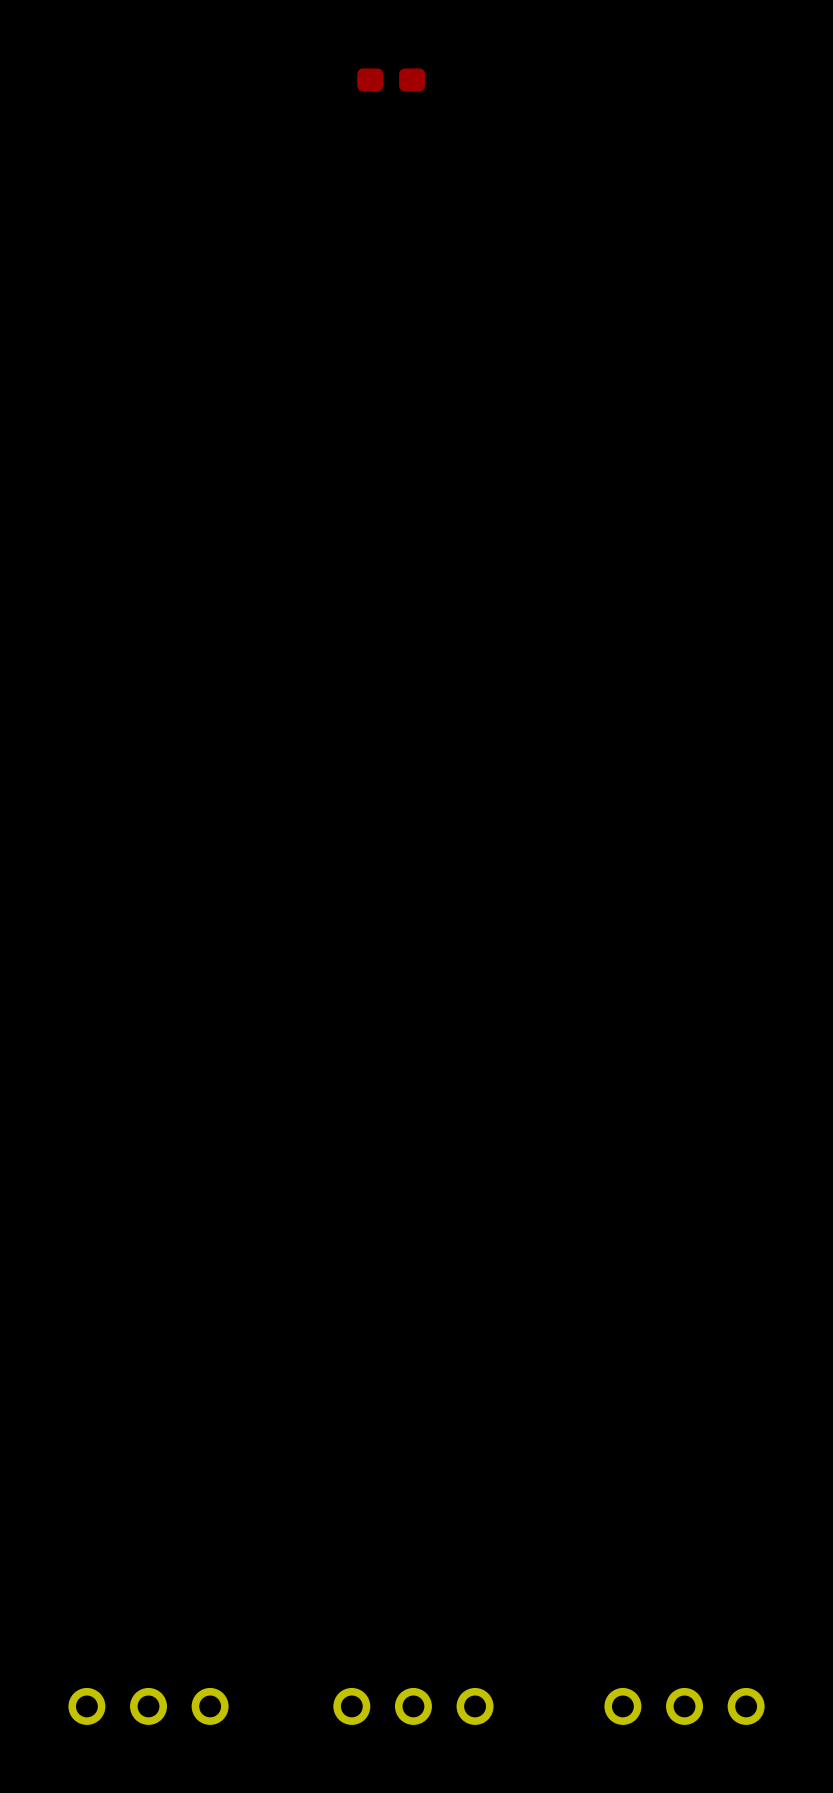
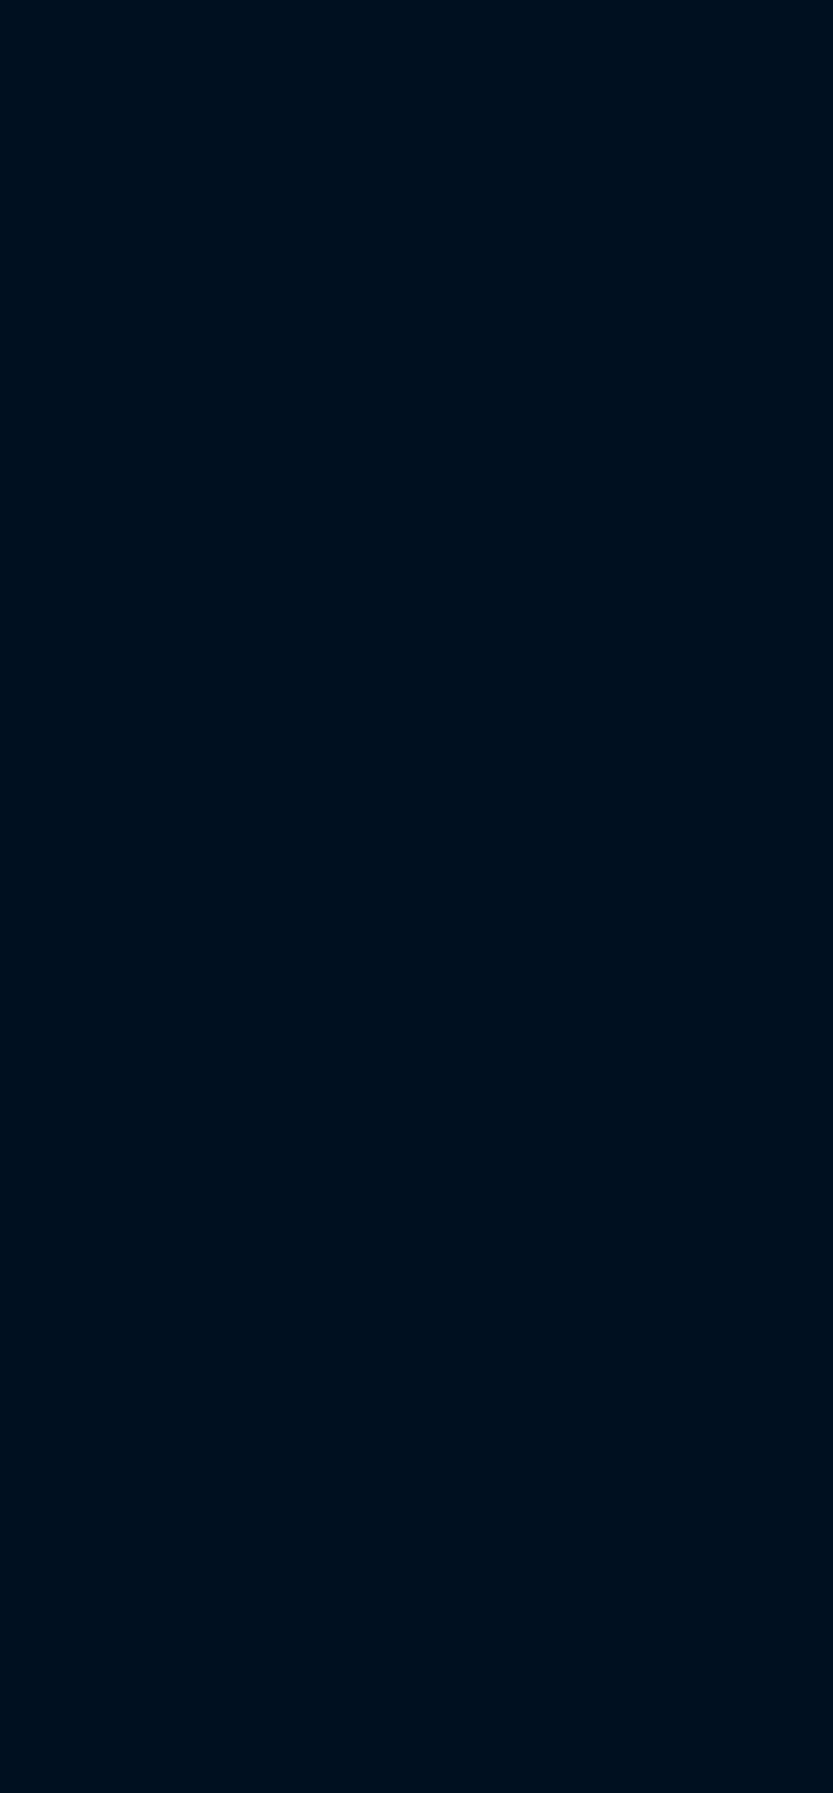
part: (391, 79) -> none
part: (148, 1706) -> none
part: (413, 1706) -> none
part: (684, 1706) -> none

